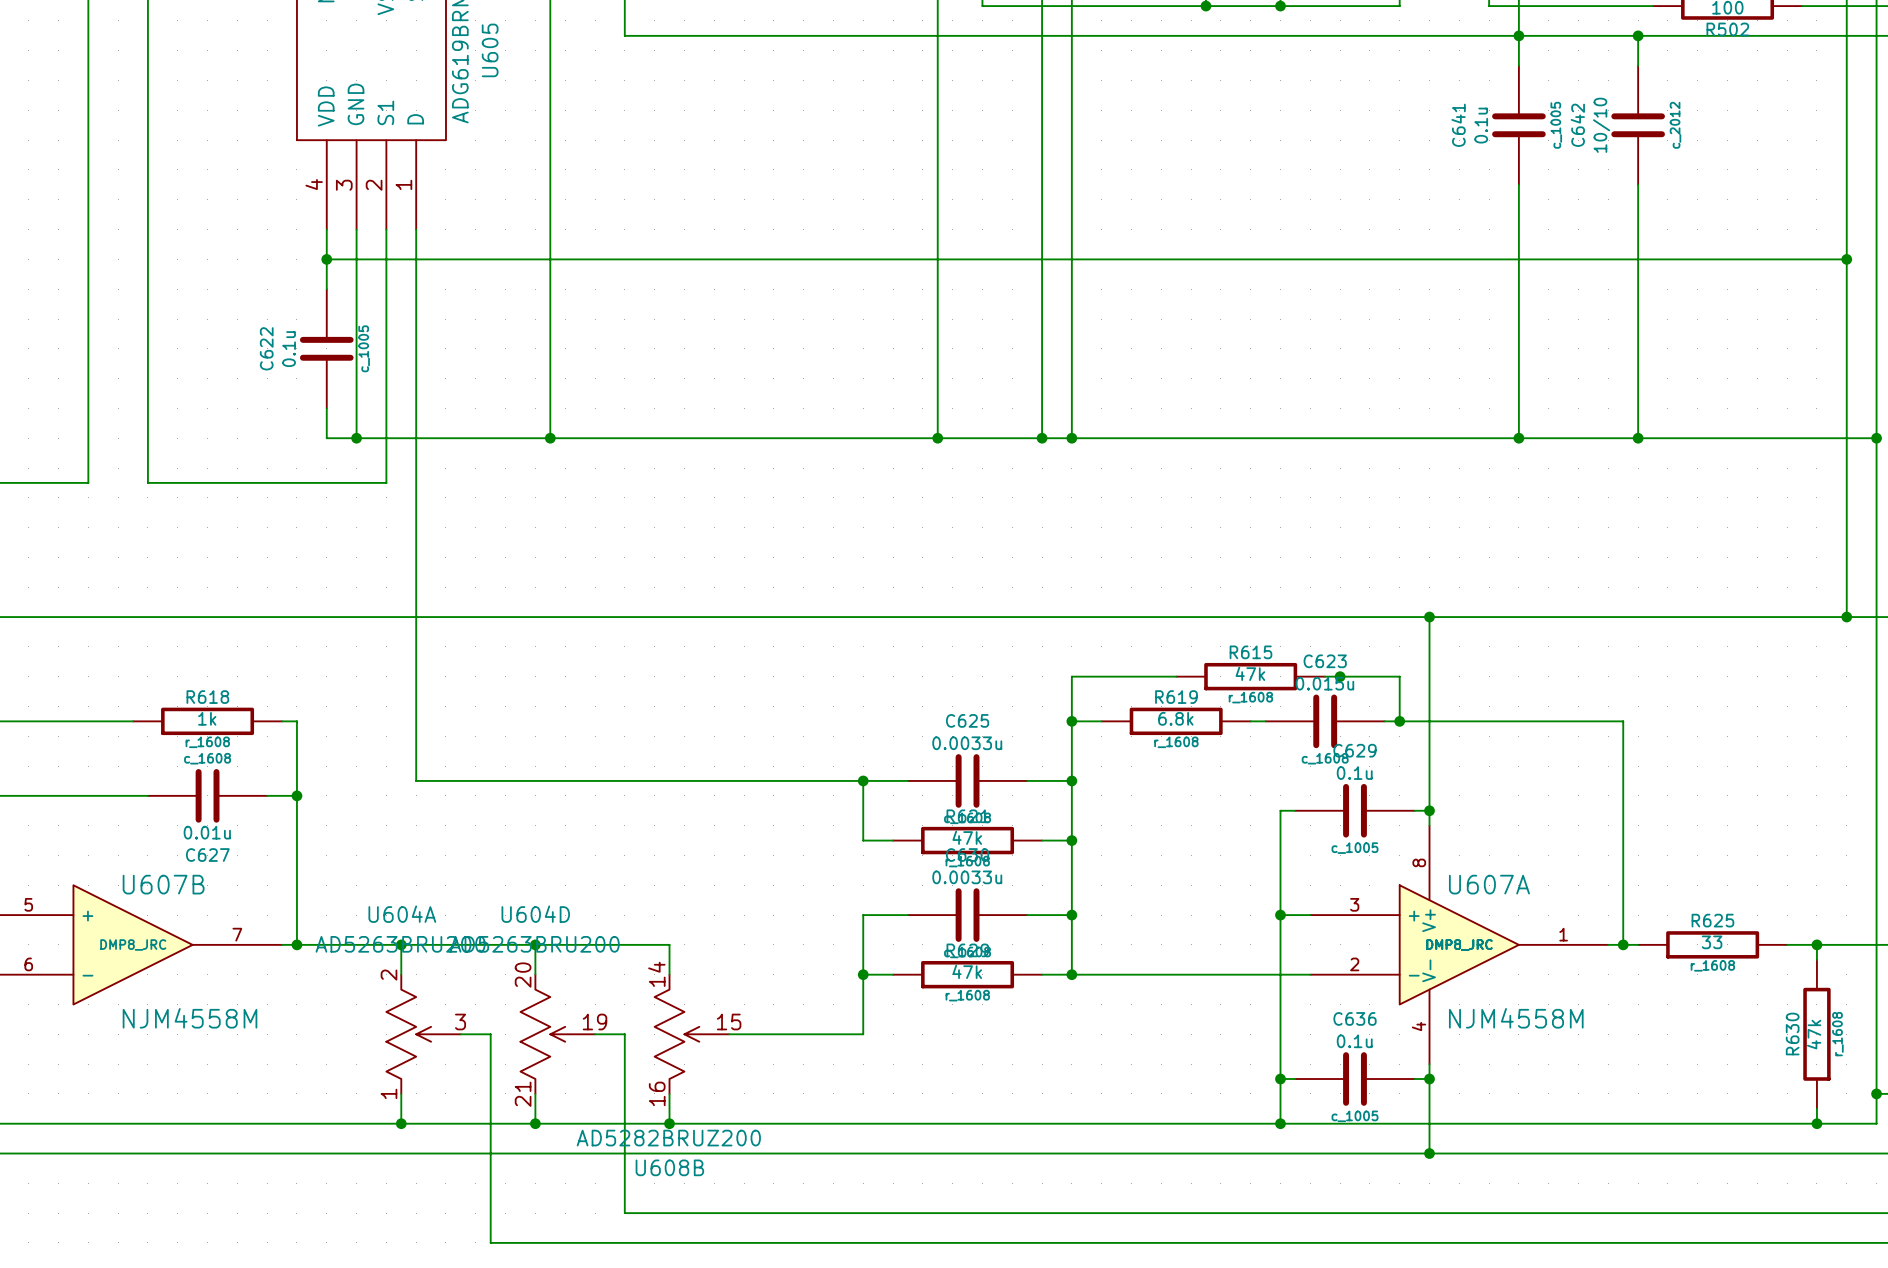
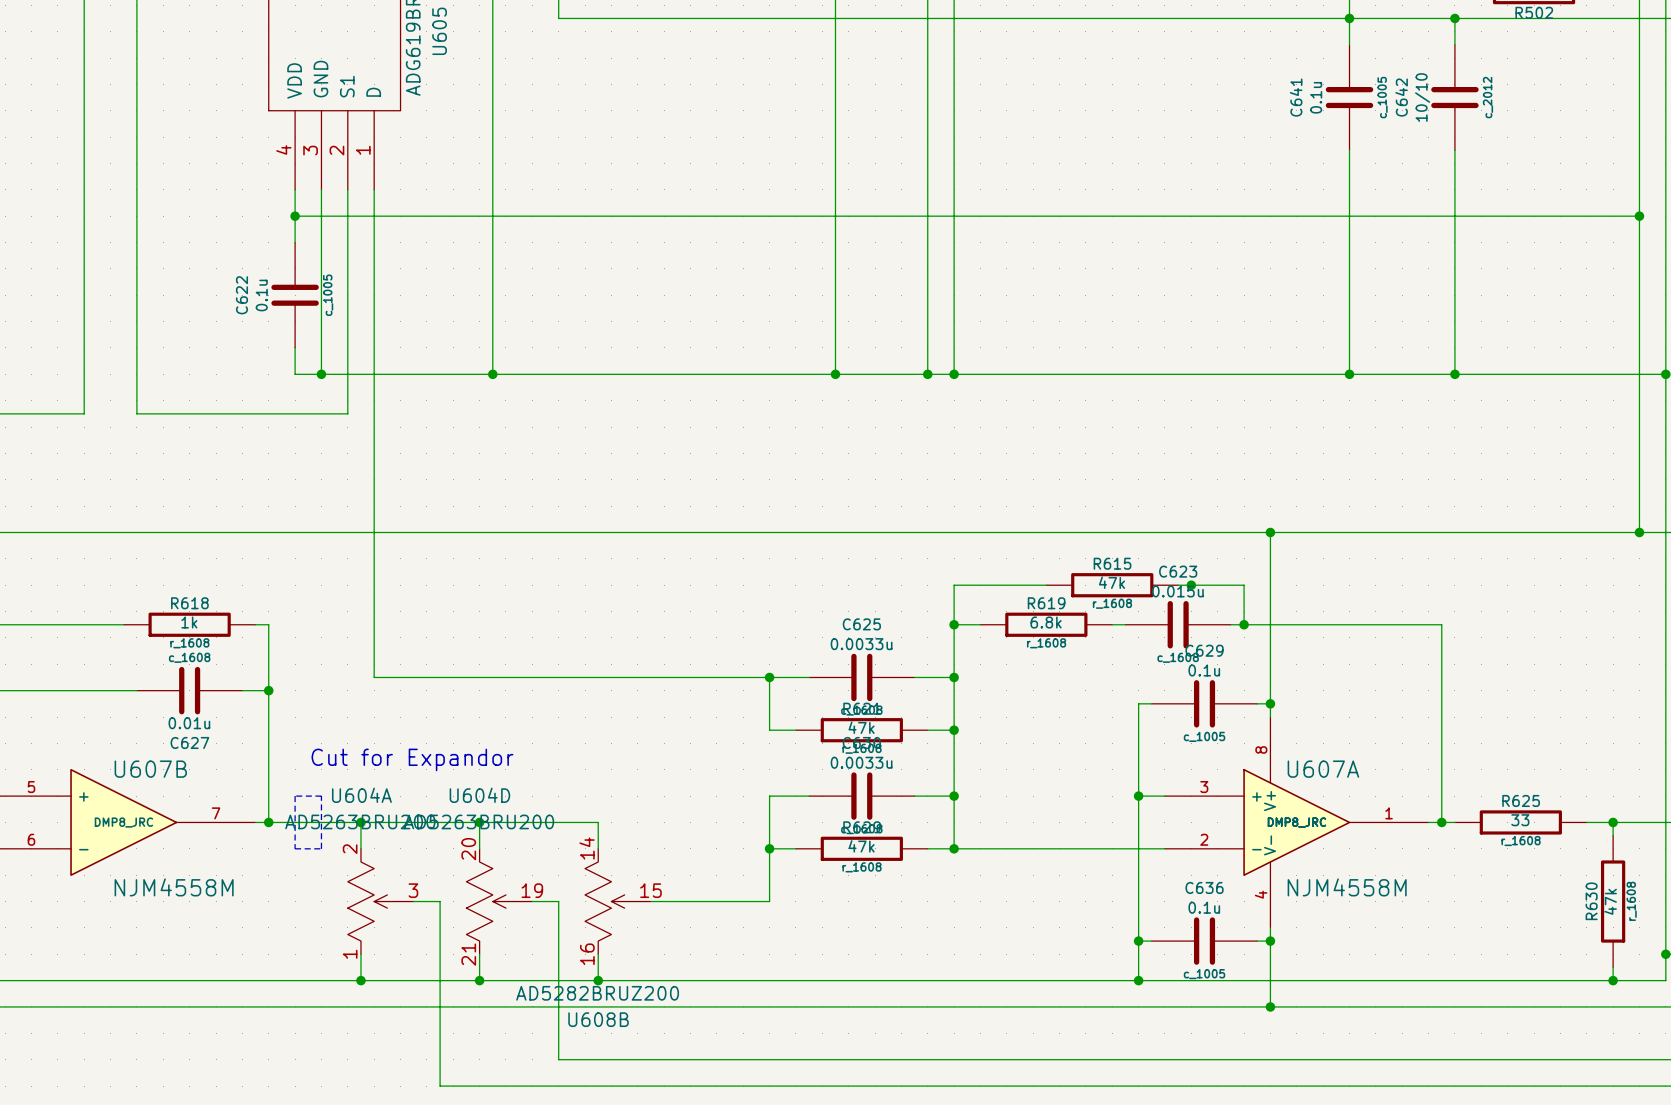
text: none -> Cut for Expandor (412, 759)
line: none -> (295, 796) (295, 848) (321, 848) (321, 796) (295, 796)

